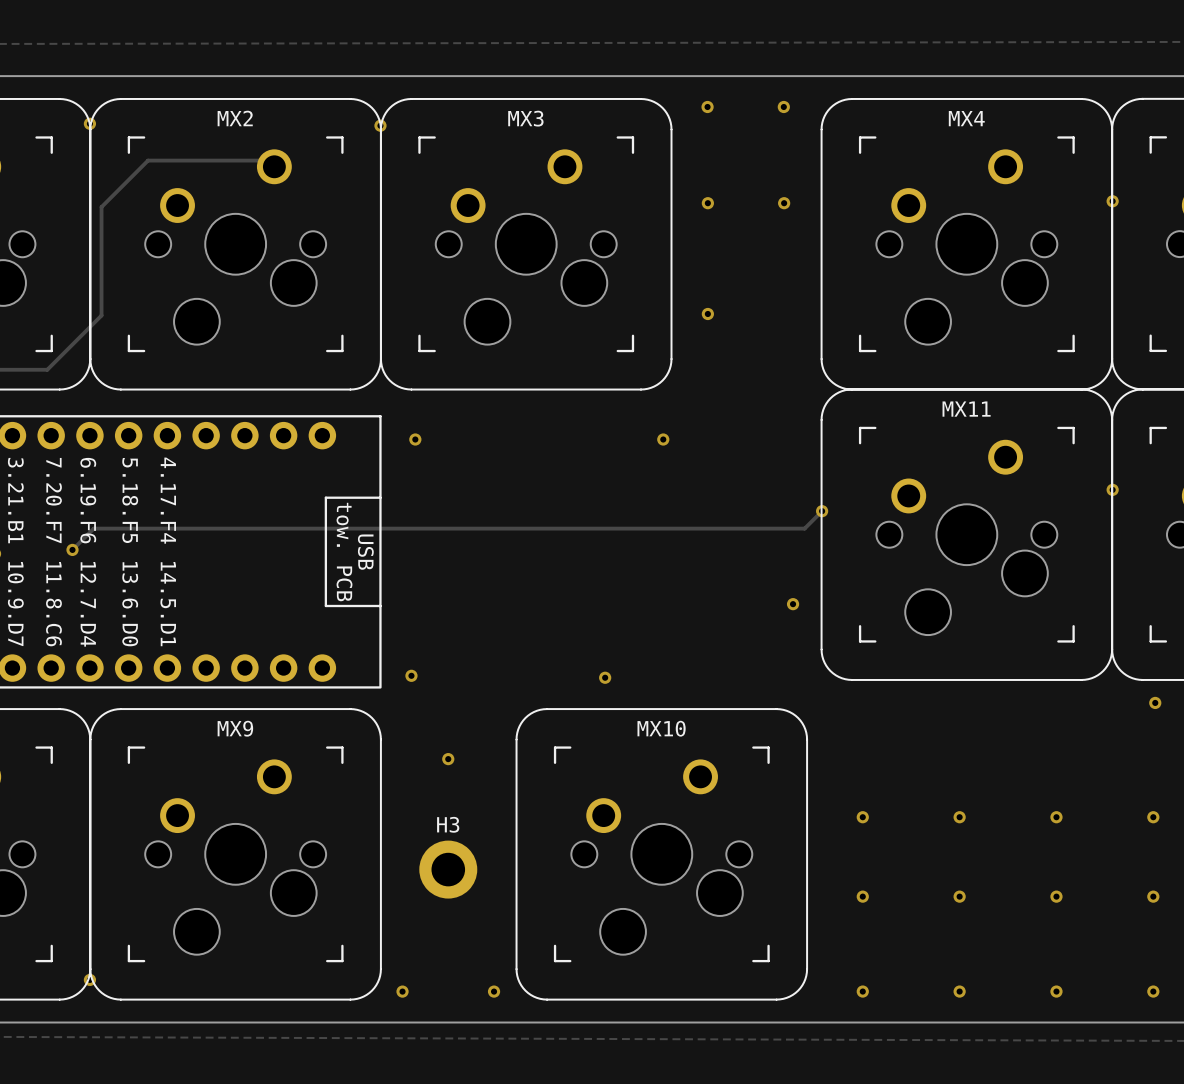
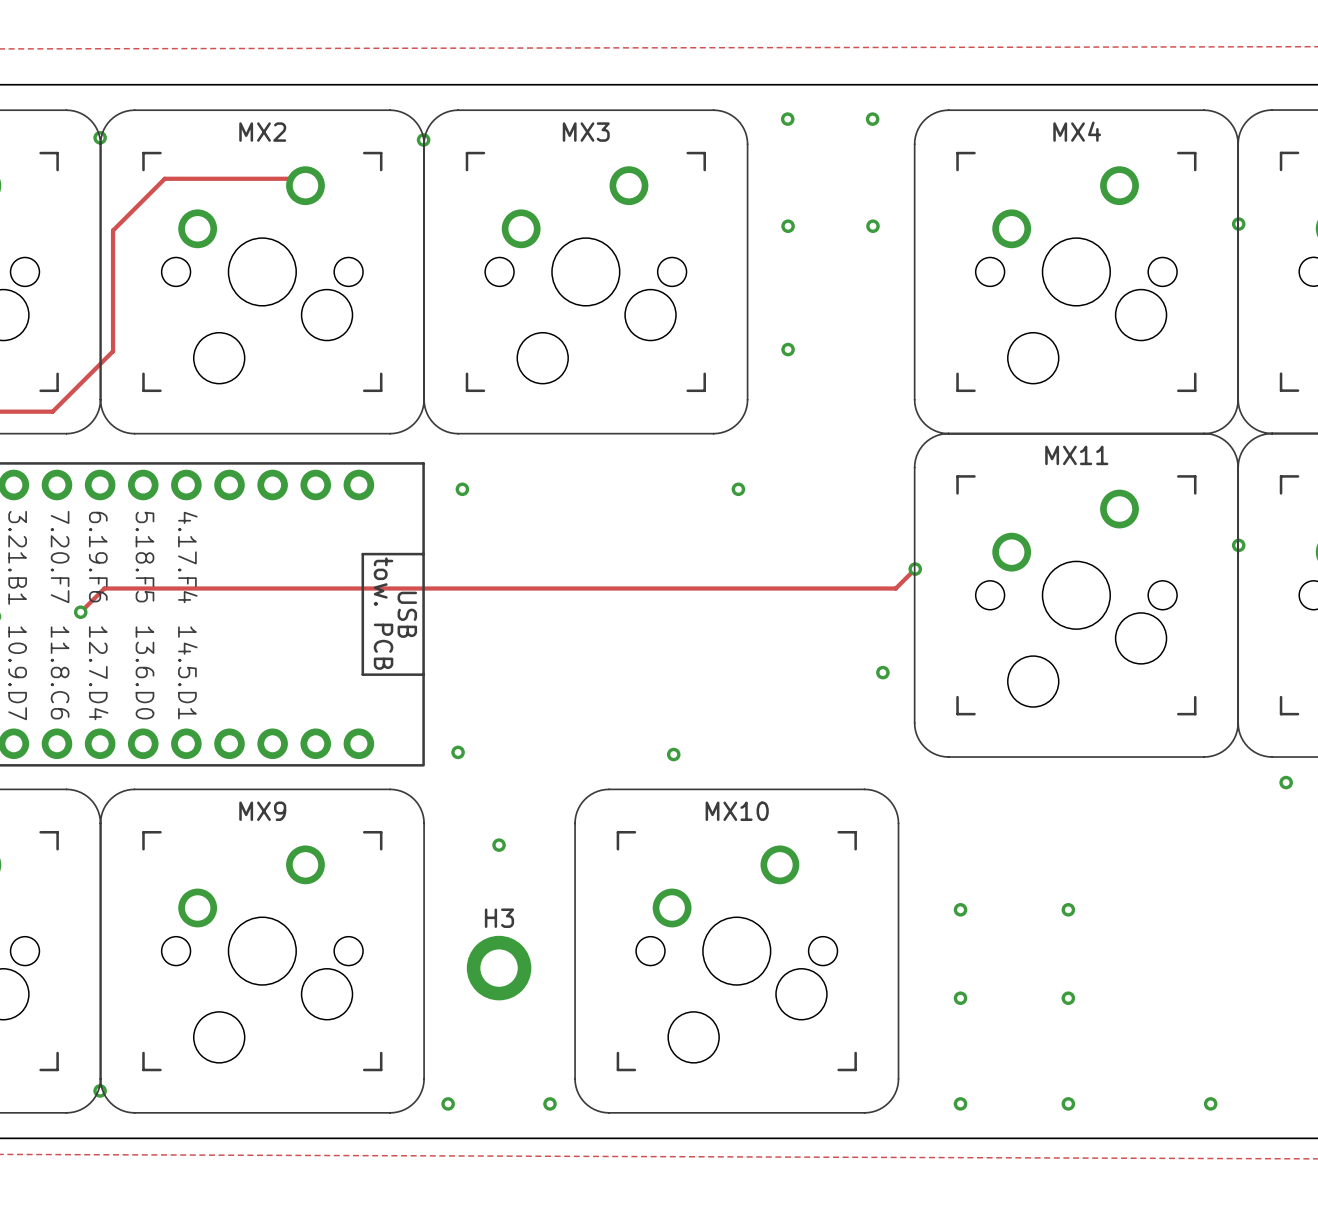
via: (1056, 817) -> none
via: (1153, 817) -> none
via: (1056, 896) -> none
via: (1153, 896) -> none
via position: (1056, 991) -> (1210, 1103)
via: (1153, 991) -> none

